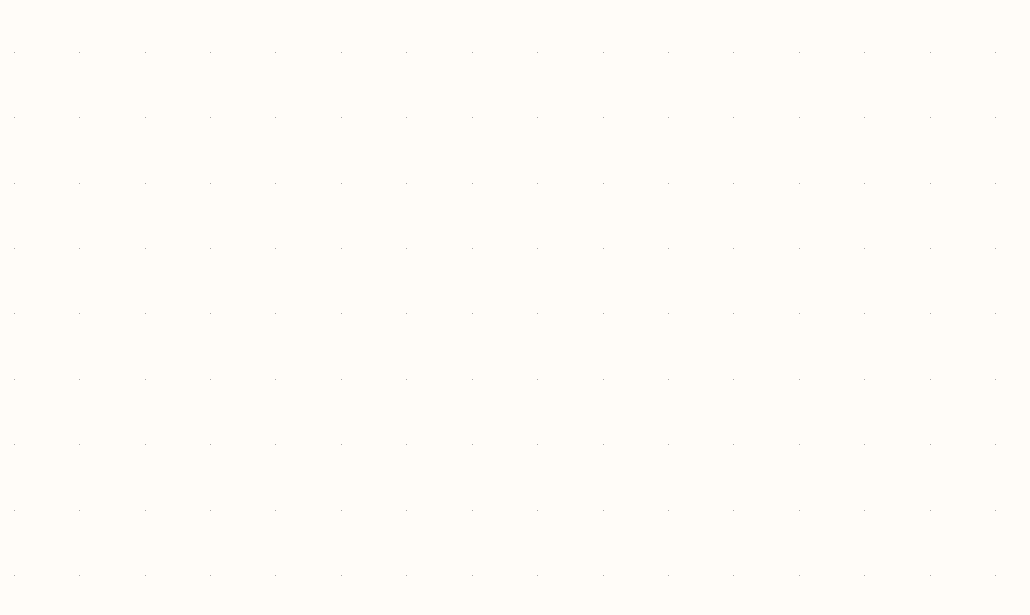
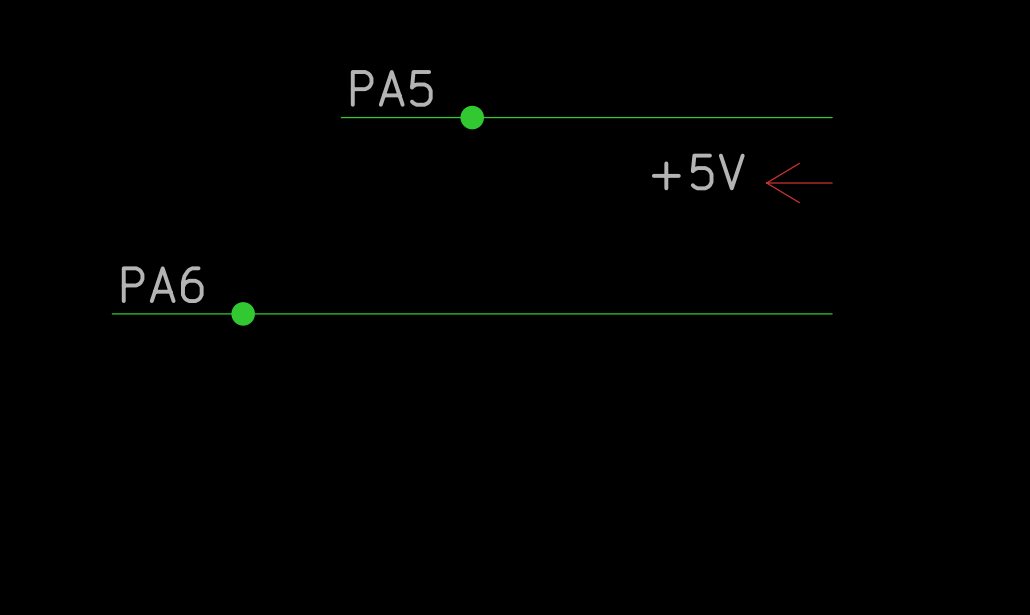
label: none -> PA5 (391, 88)
wire: none -> (341, 117) (832, 117)
junction: none -> (472, 117)
power symbol: none -> +5V (799, 183)
label: none -> PA6 (162, 284)
wire: none -> (112, 313) (832, 313)
junction: none -> (243, 313)

